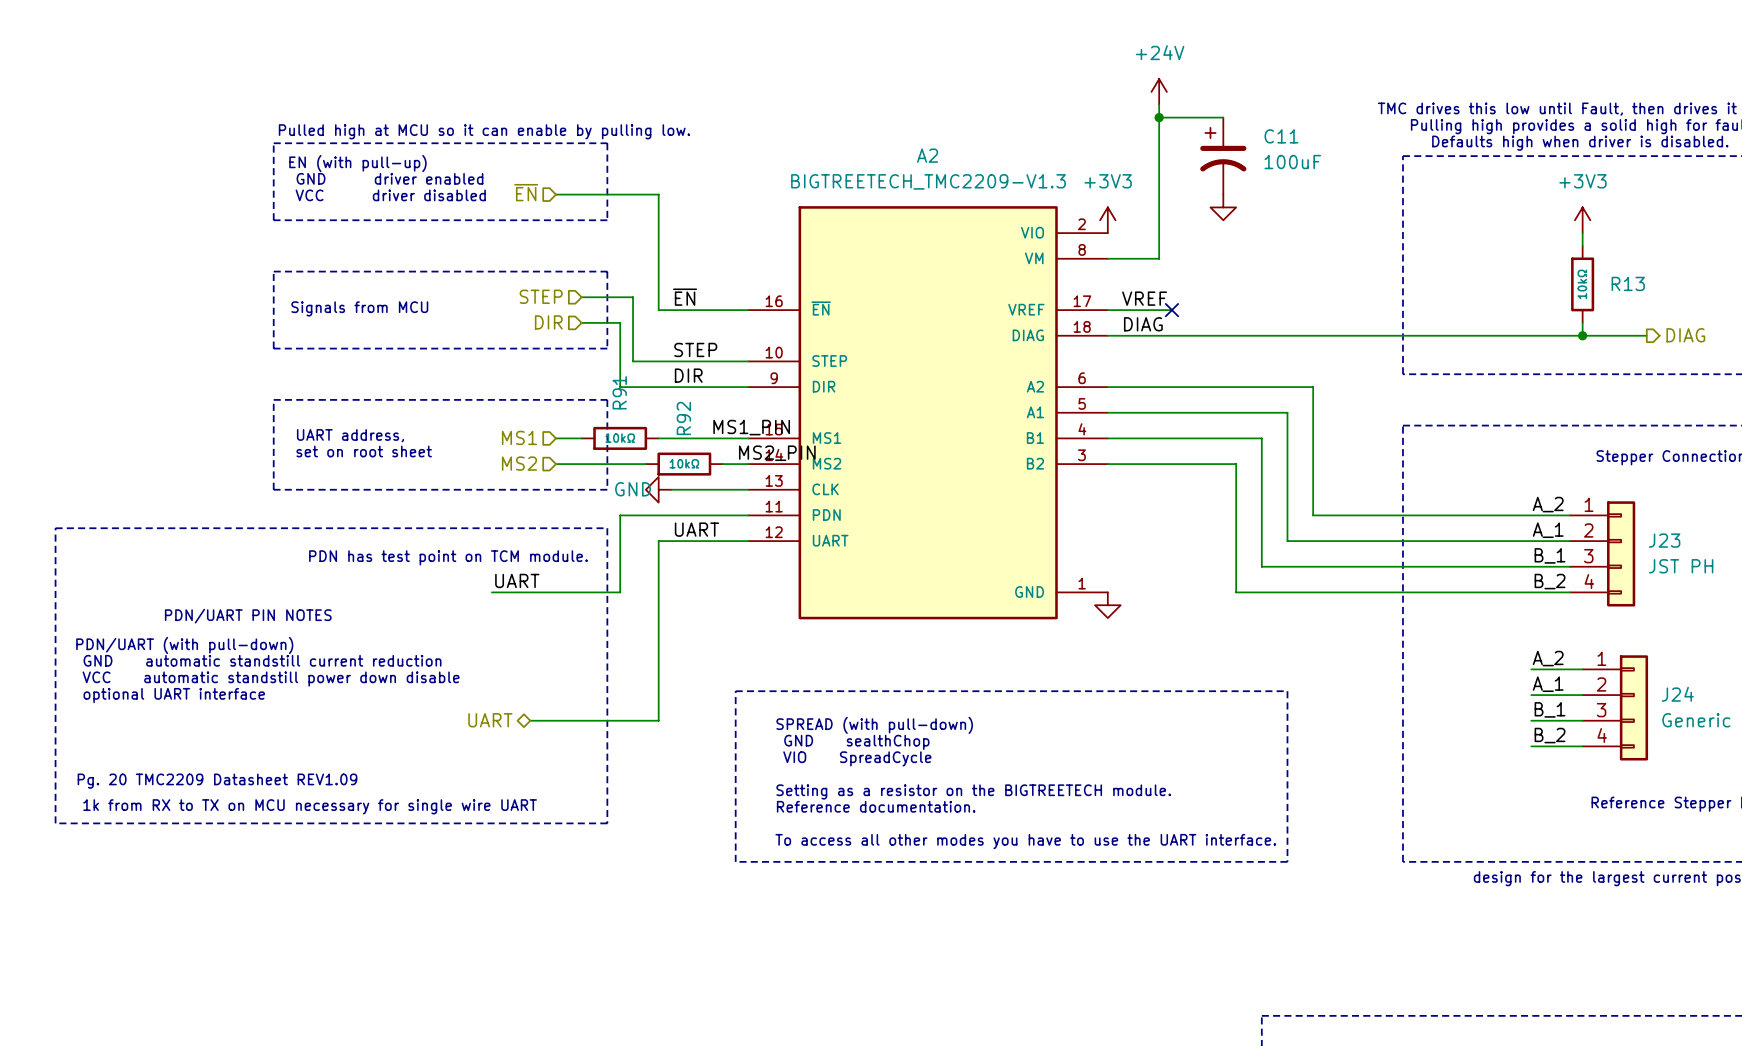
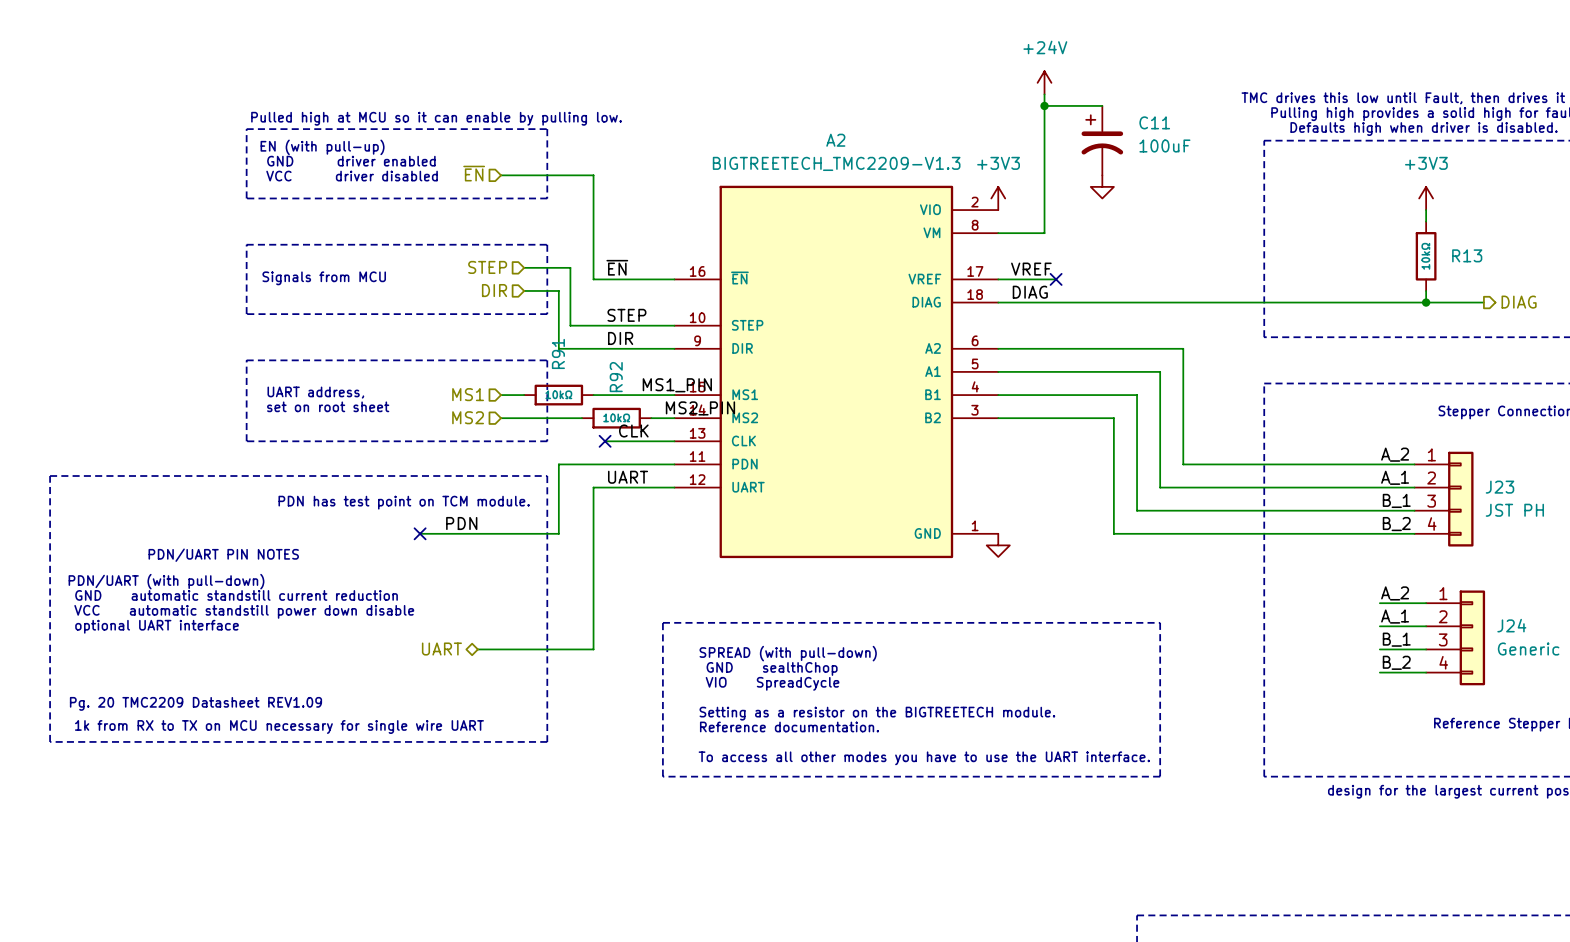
label: none -> CLK (633, 430)
power symbol: GND (658, 489) -> none
no-connect mark: none -> (605, 441)
label: UART (517, 580) -> PDN (461, 523)
wire: none -> (420, 533) (443, 533)
no-connect mark: none -> (420, 533)

